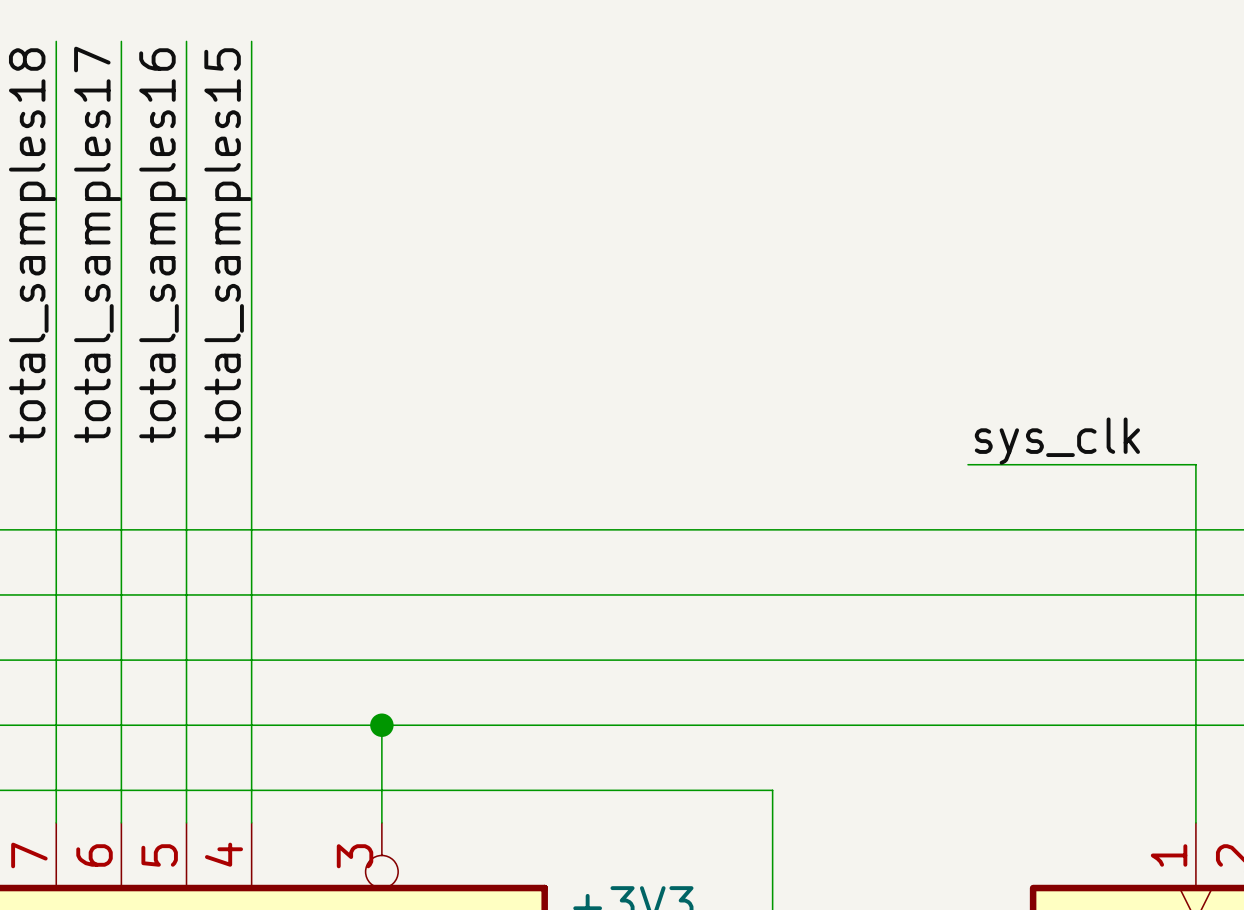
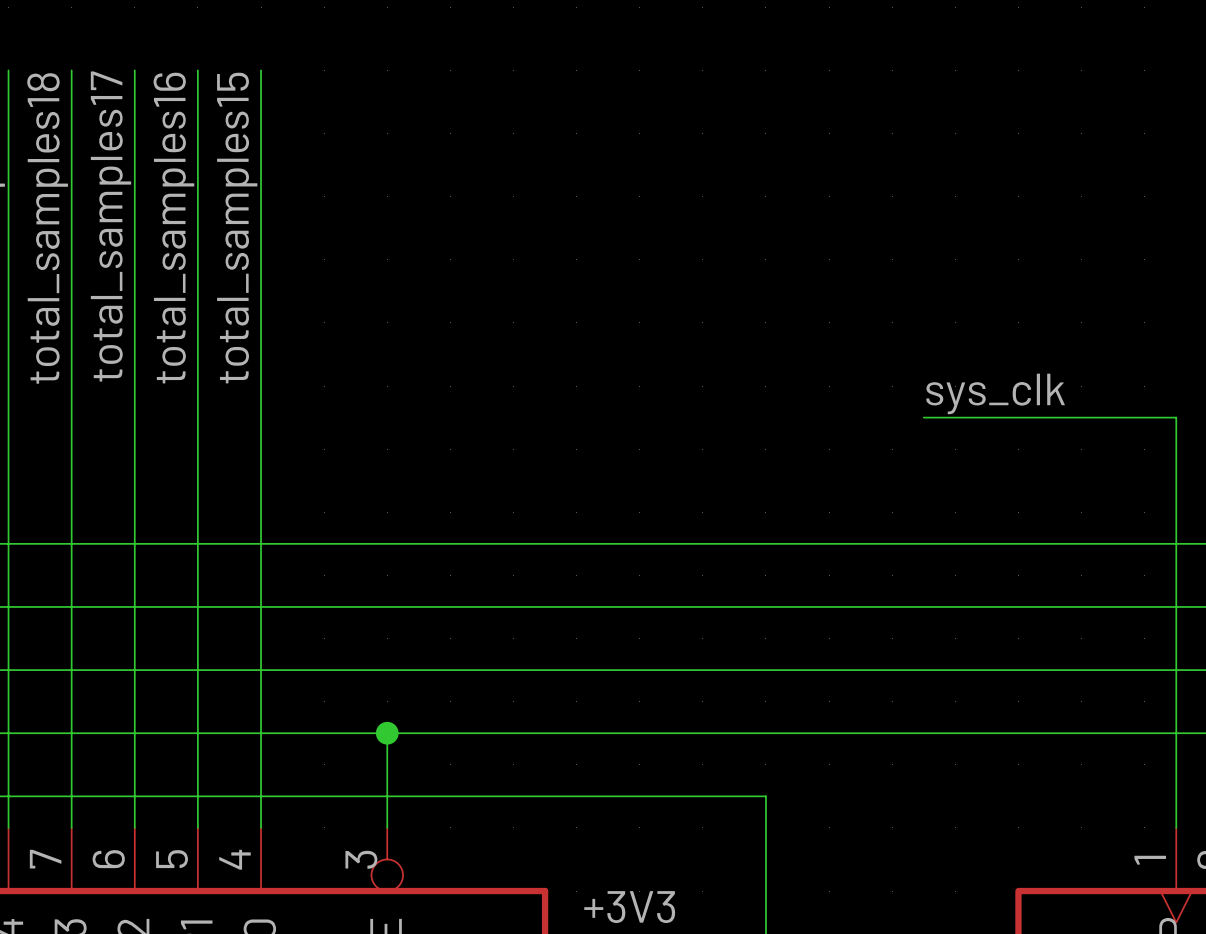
label position: sys_clk (1057, 441) -> sys_clk (995, 393)
wire: (967, 464) (1195, 464) -> (923, 417) (1176, 417) (1176, 480)

